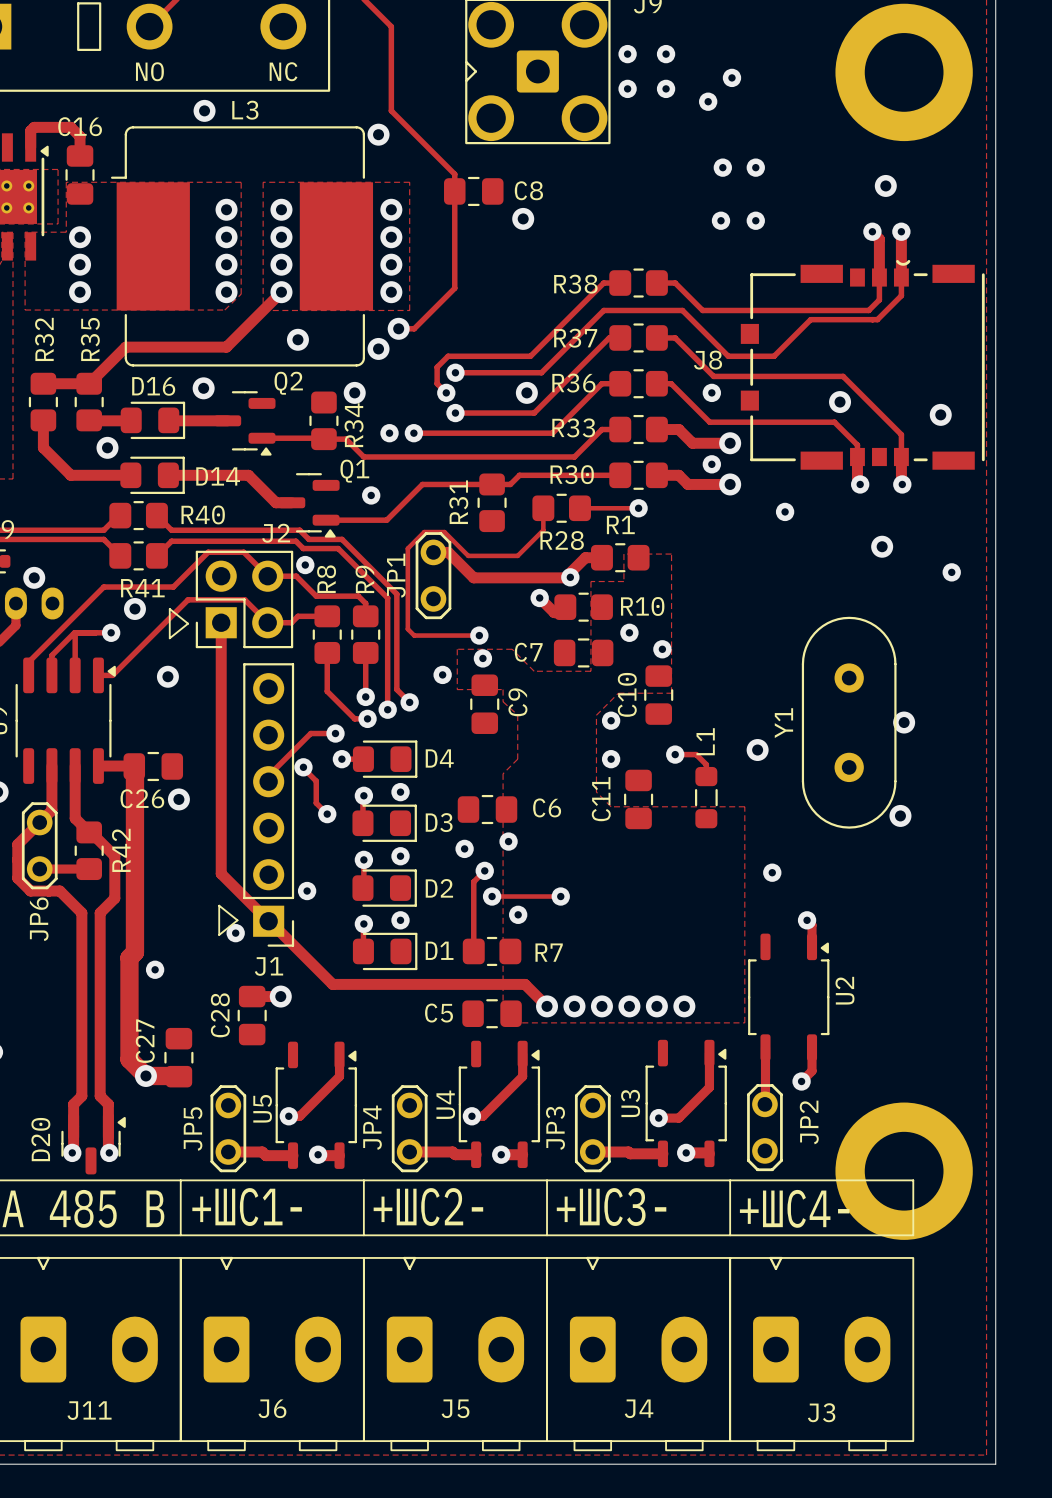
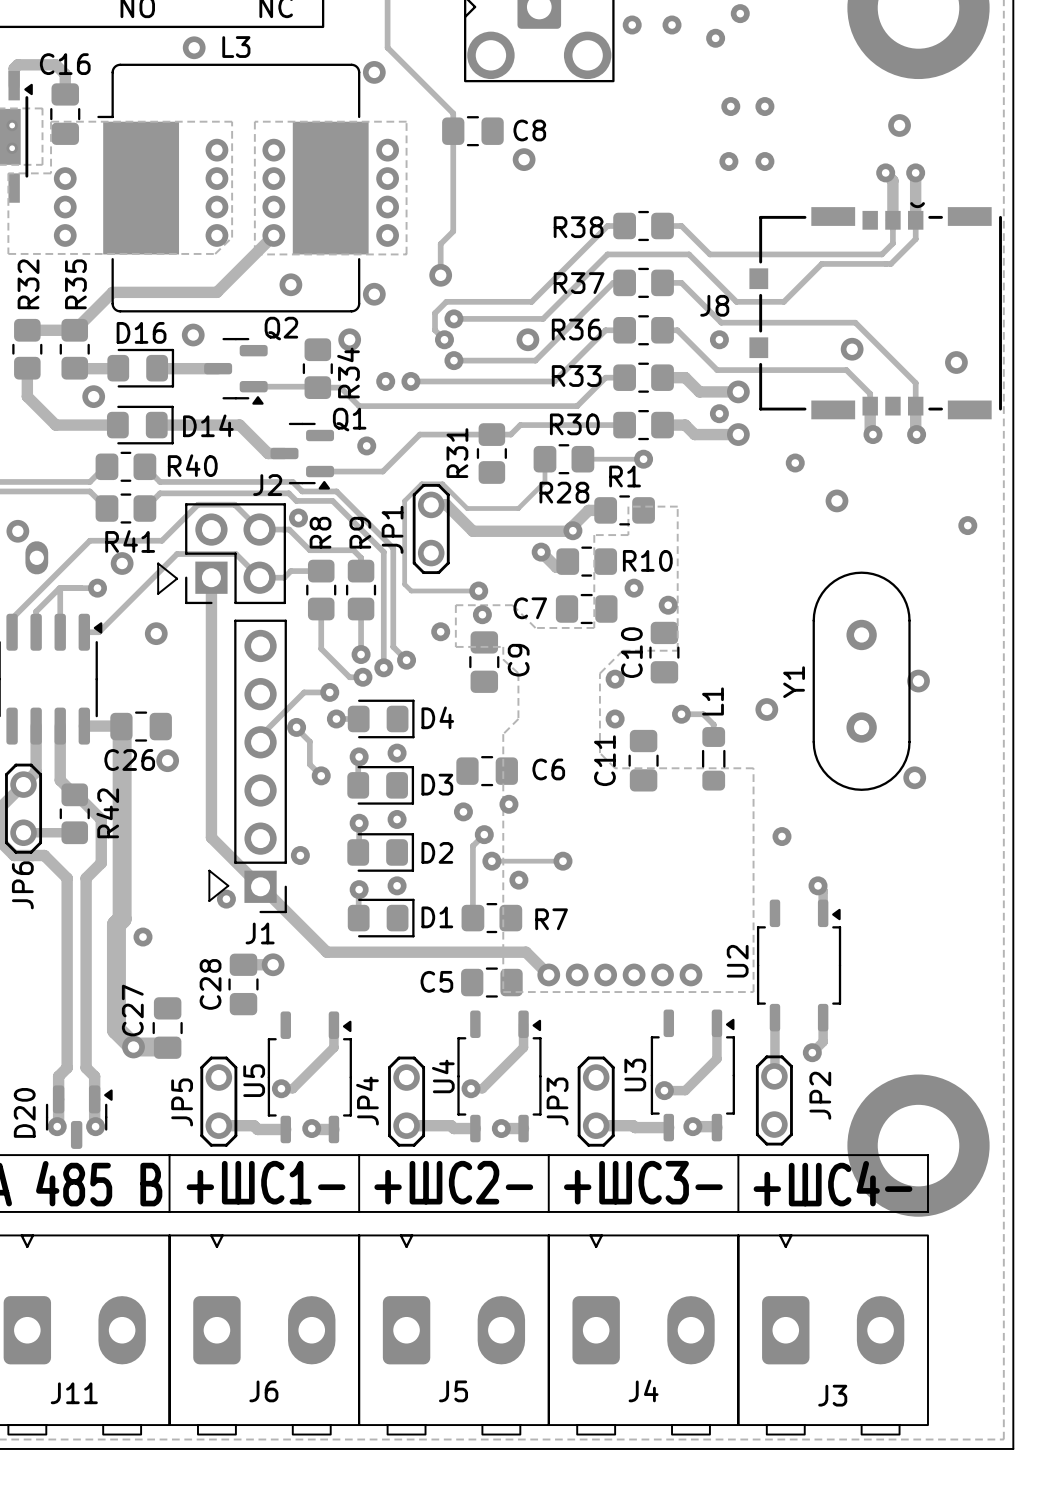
track: (442, 300) (414, 328) (398, 328) -> (440, 244) (440, 275)
via position: (398, 328) -> (440, 275)
via position: (882, 546) -> (836, 500)
U2 name position: U2 (844, 990) -> U2 (737, 961)

